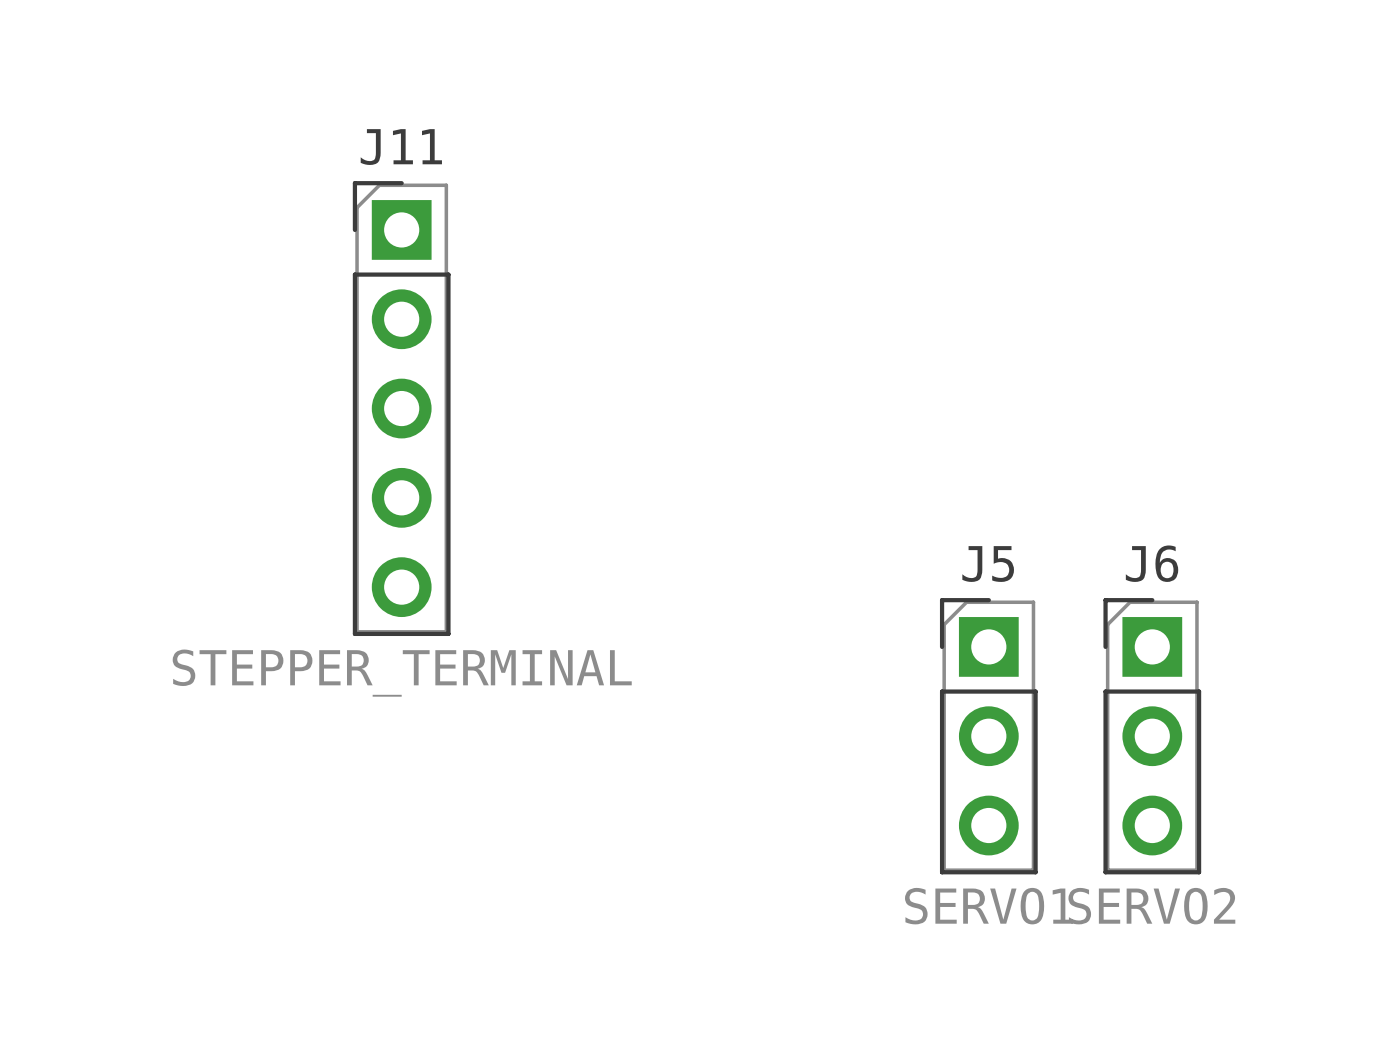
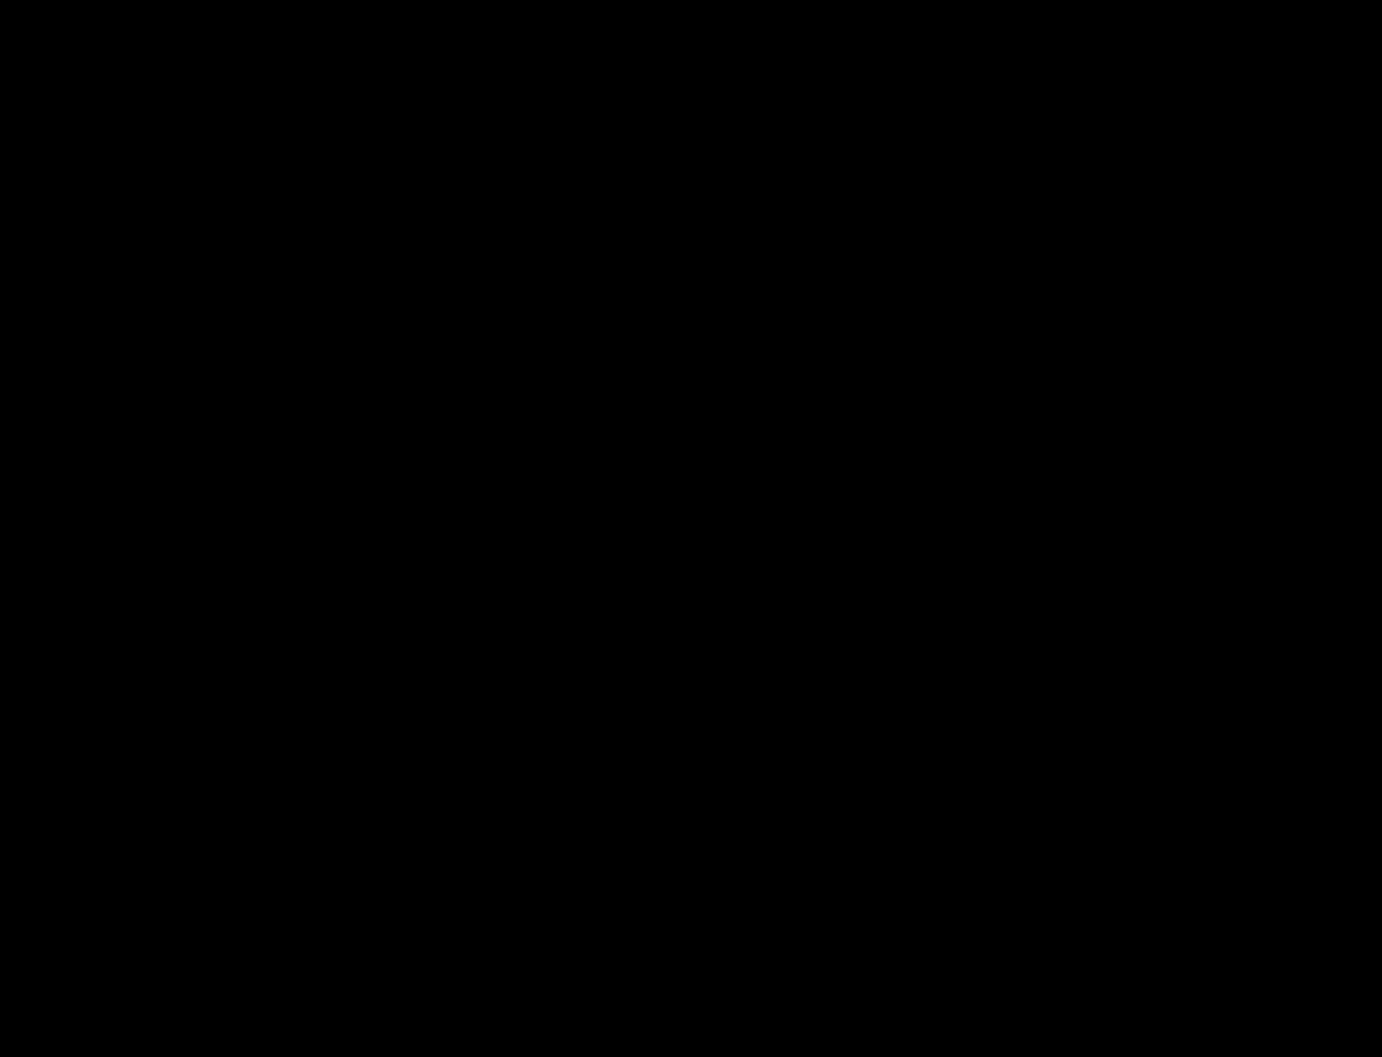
J11: STEPPER_TERMINAL (401, 408) -> none
J5: SERVO1 (988, 736) -> none
J6: SERVO2 (1152, 736) -> none

